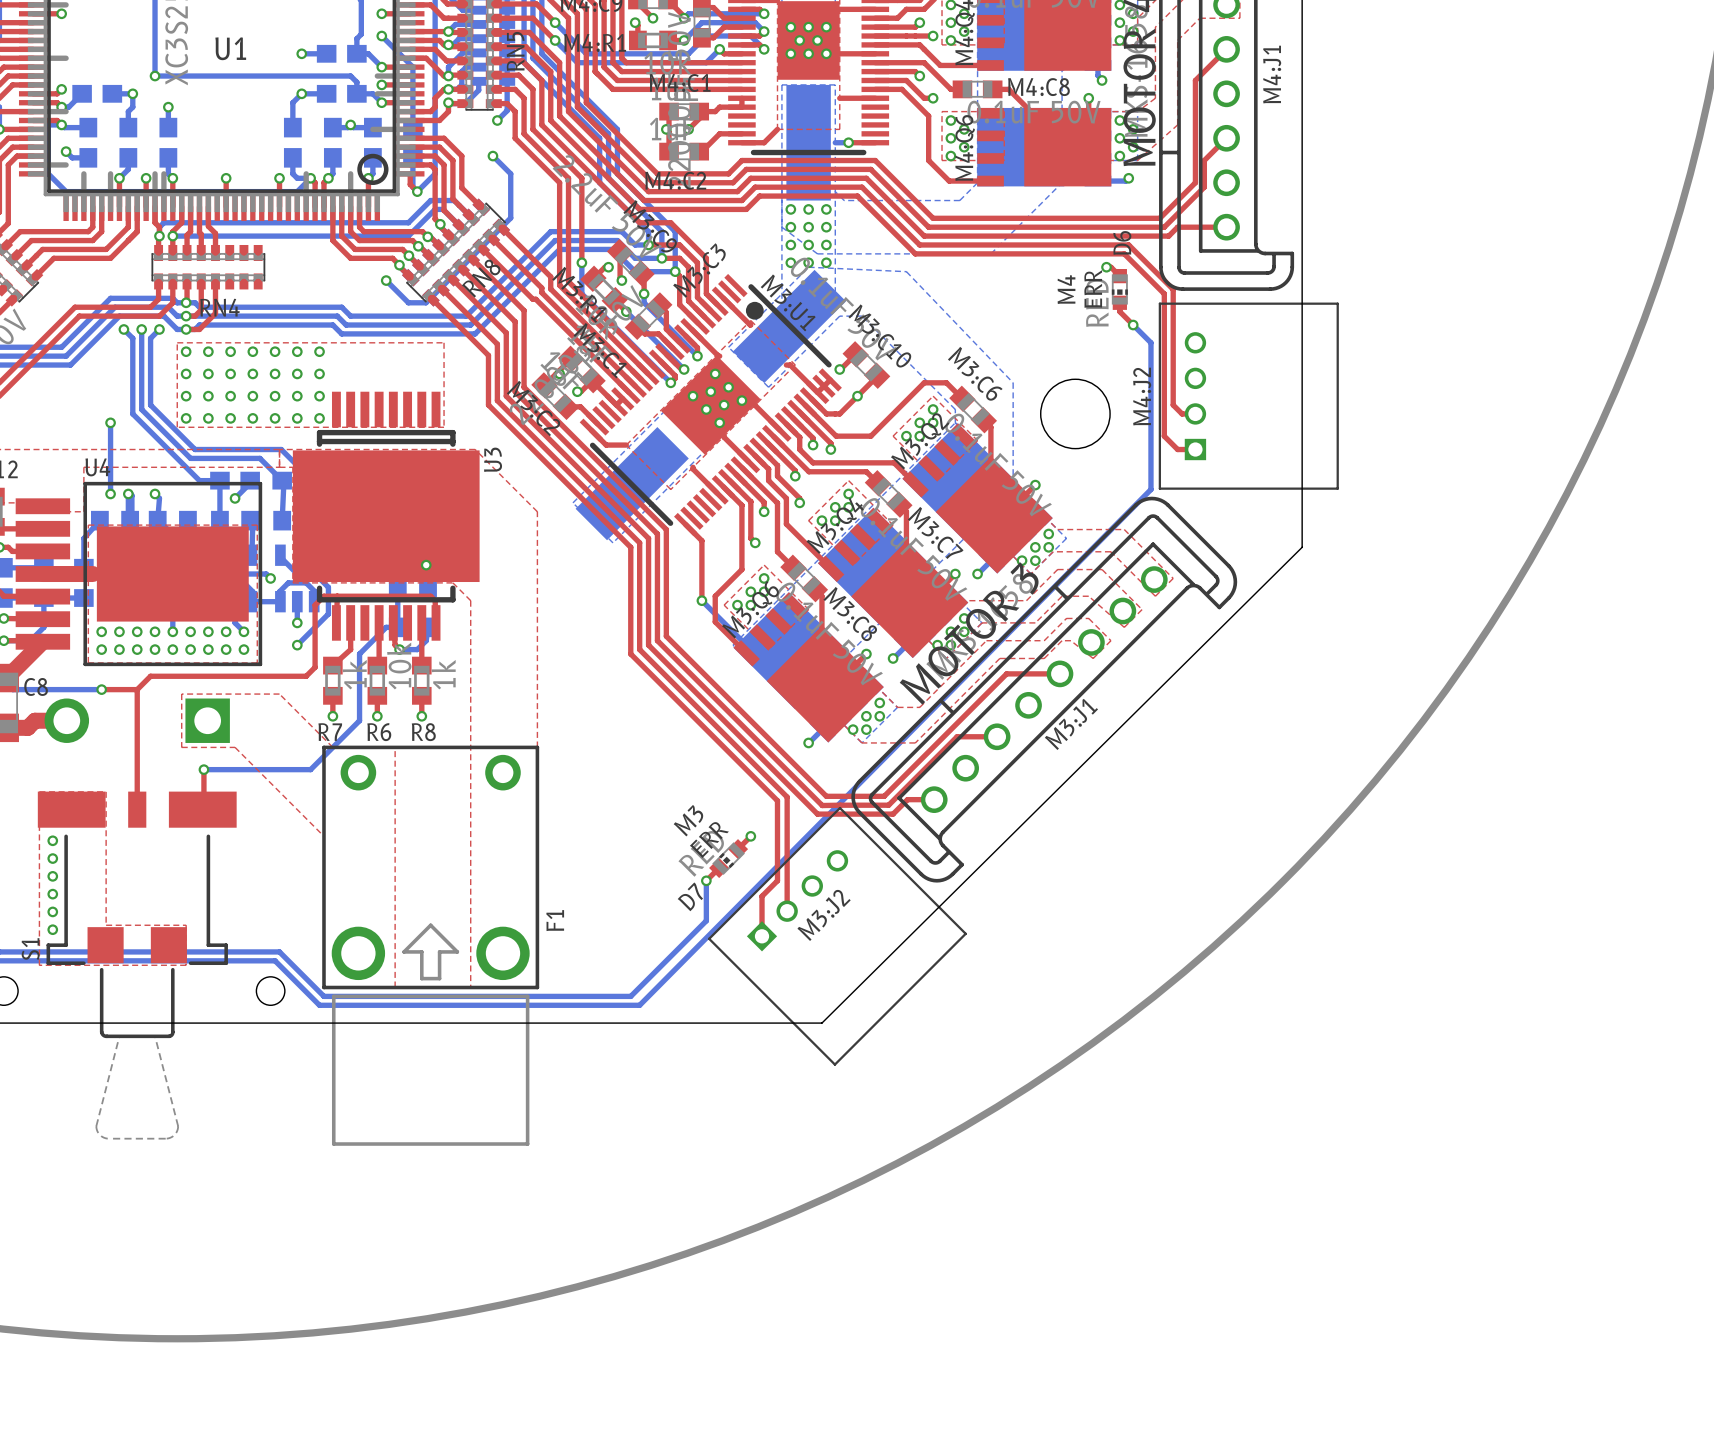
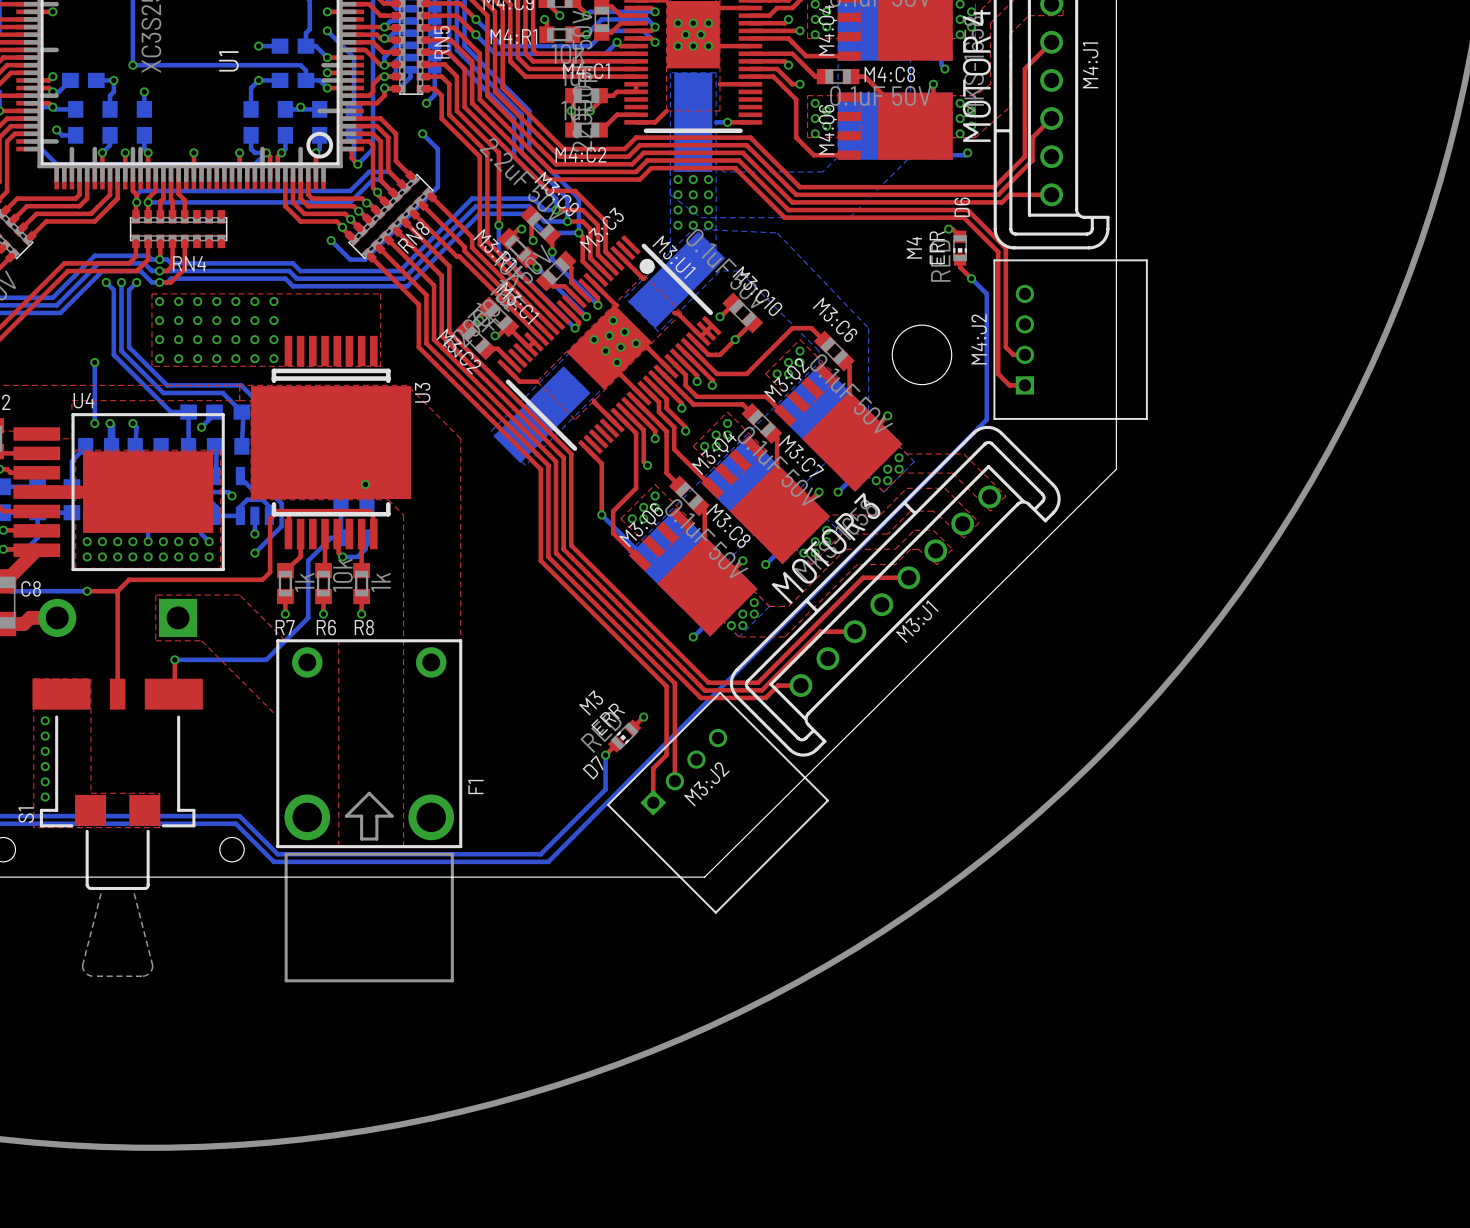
U1 name rotation: 0° (230, 48) -> 90° counterclockwise (228, 61)

